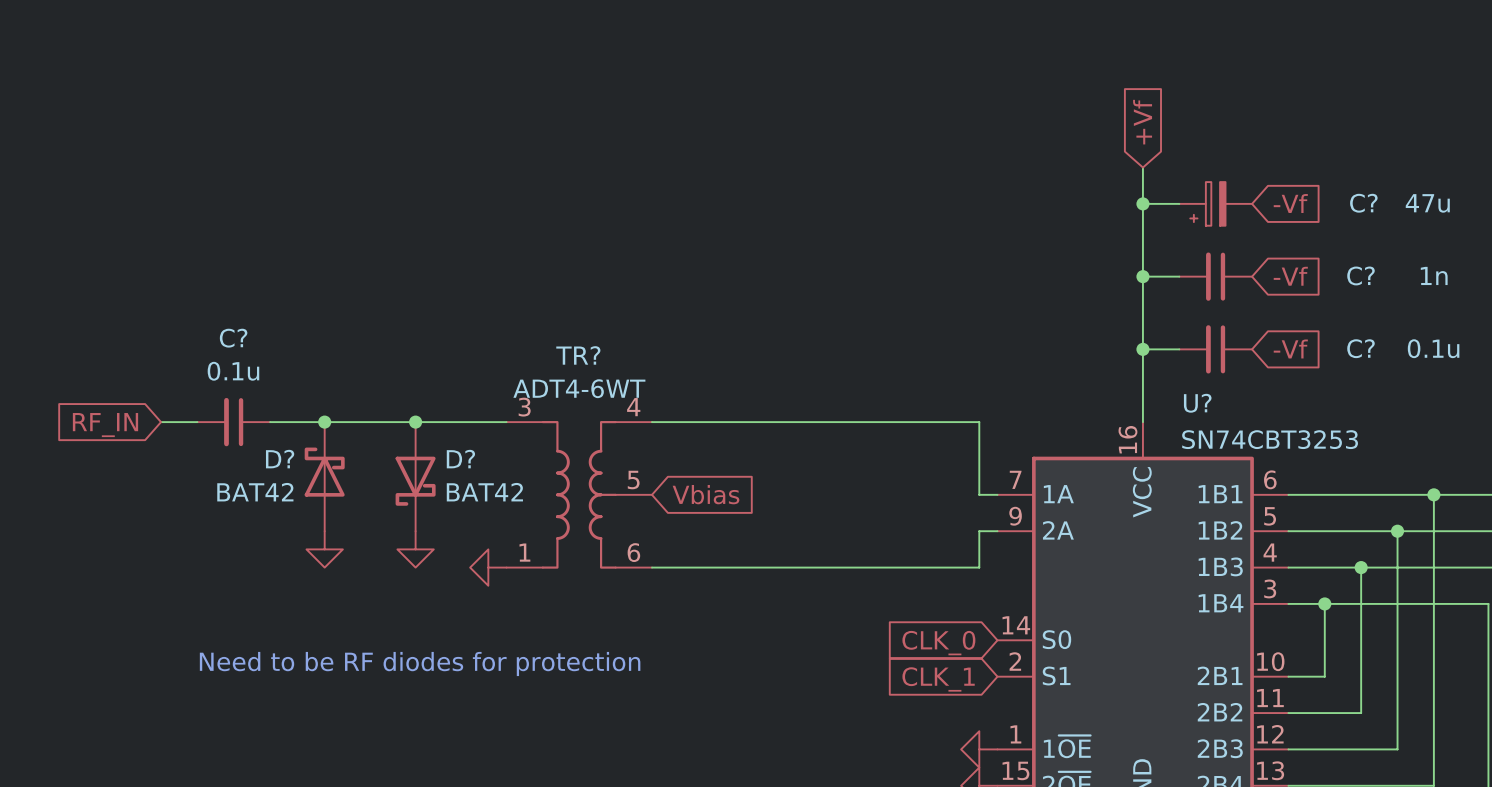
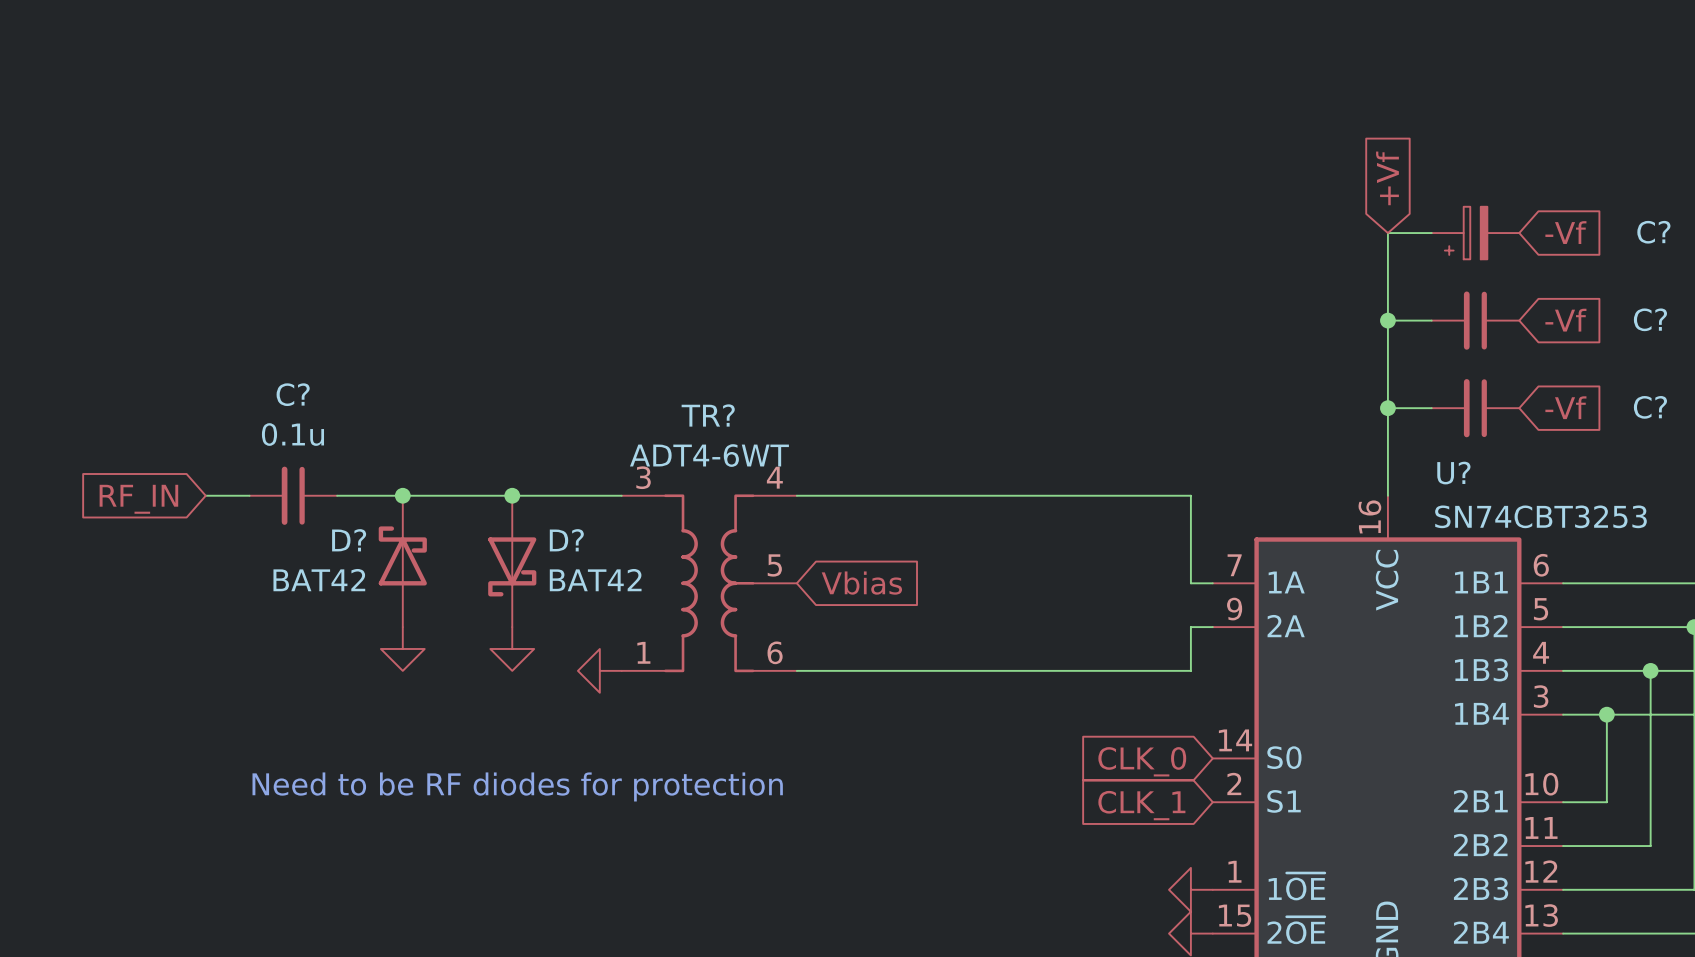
global label position: +Vf (1142, 122) -> +Vf (1387, 178)
wire: (1142, 167) (1142, 203) -> none
junction: (1142, 203) -> none

